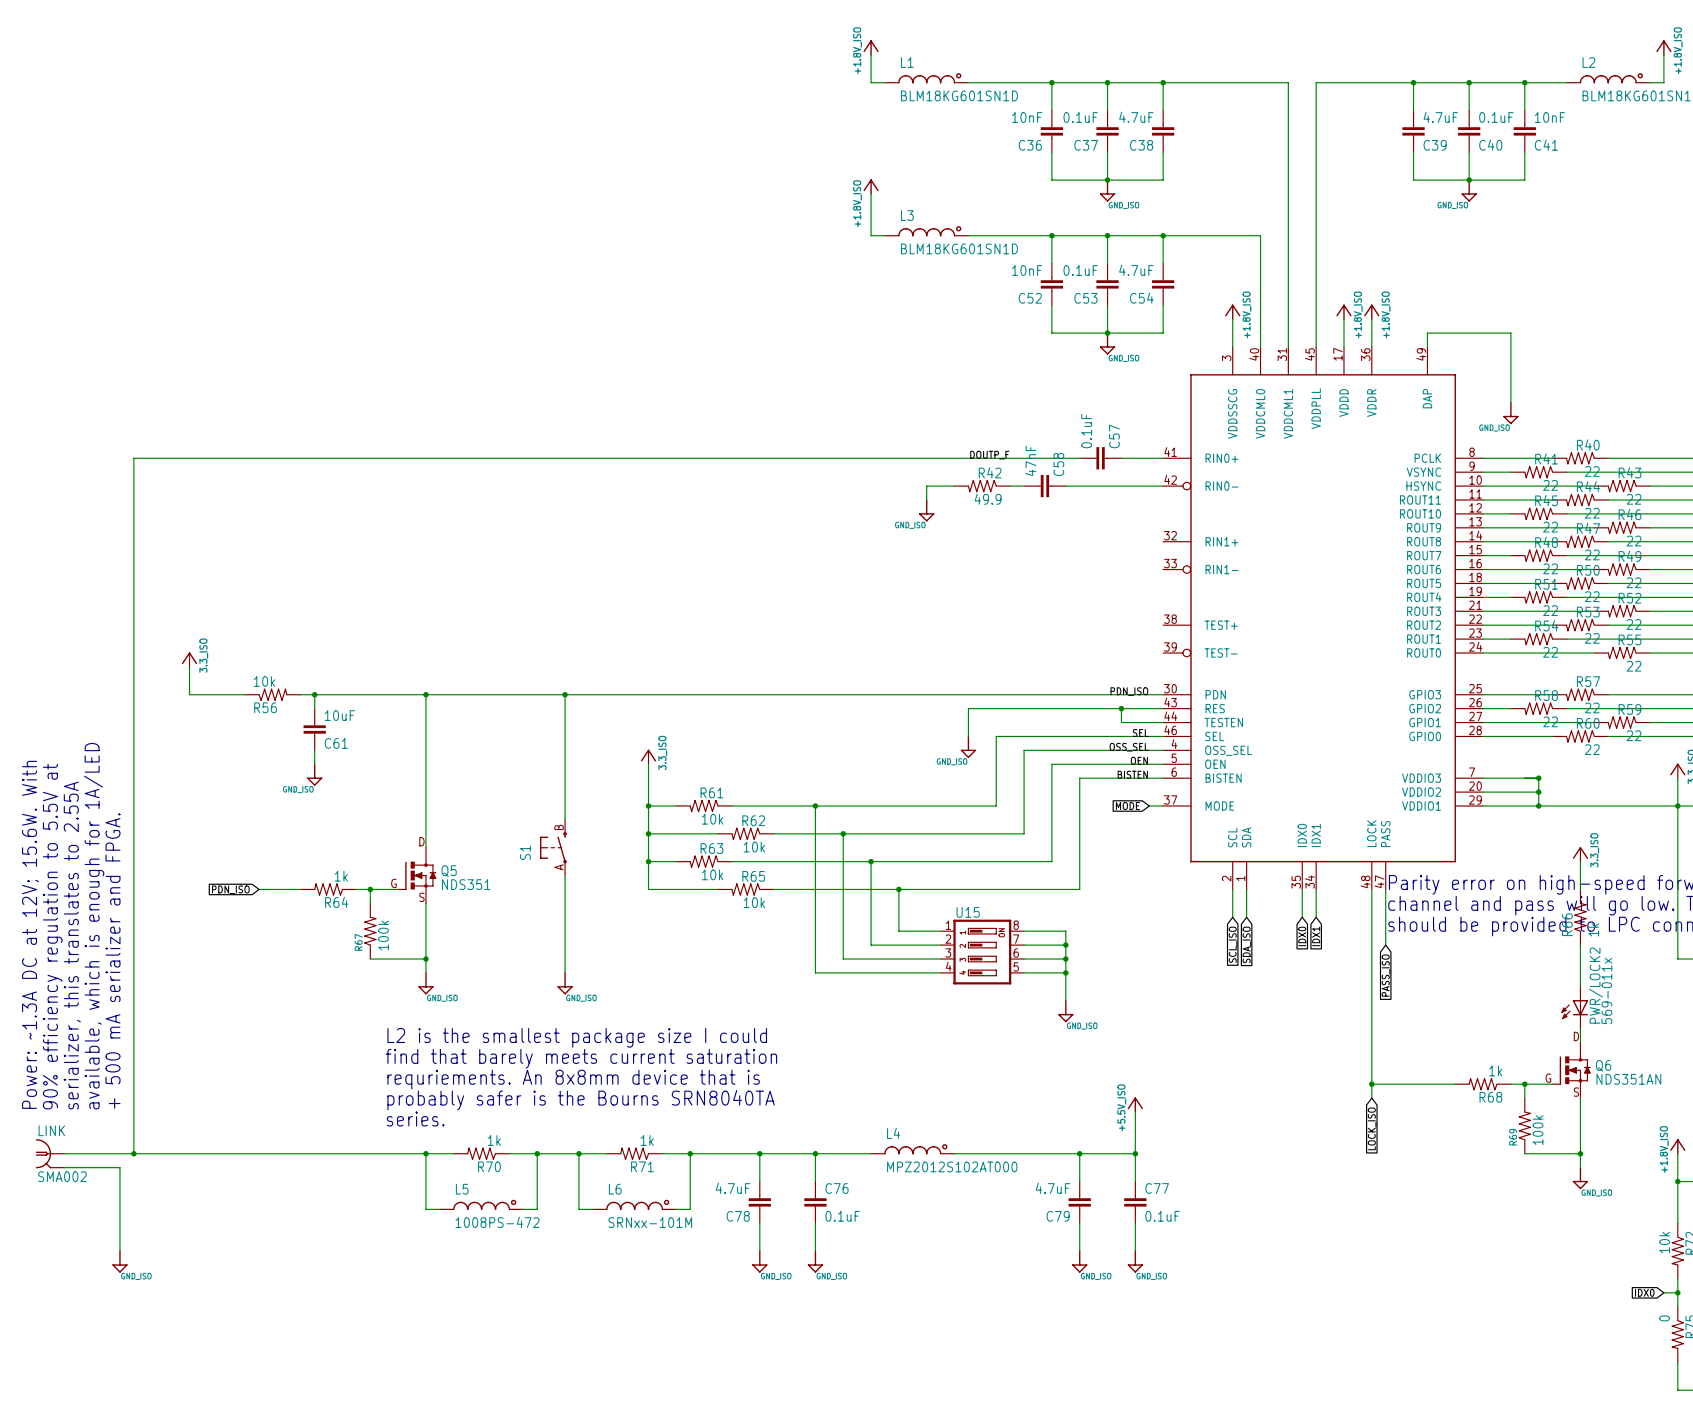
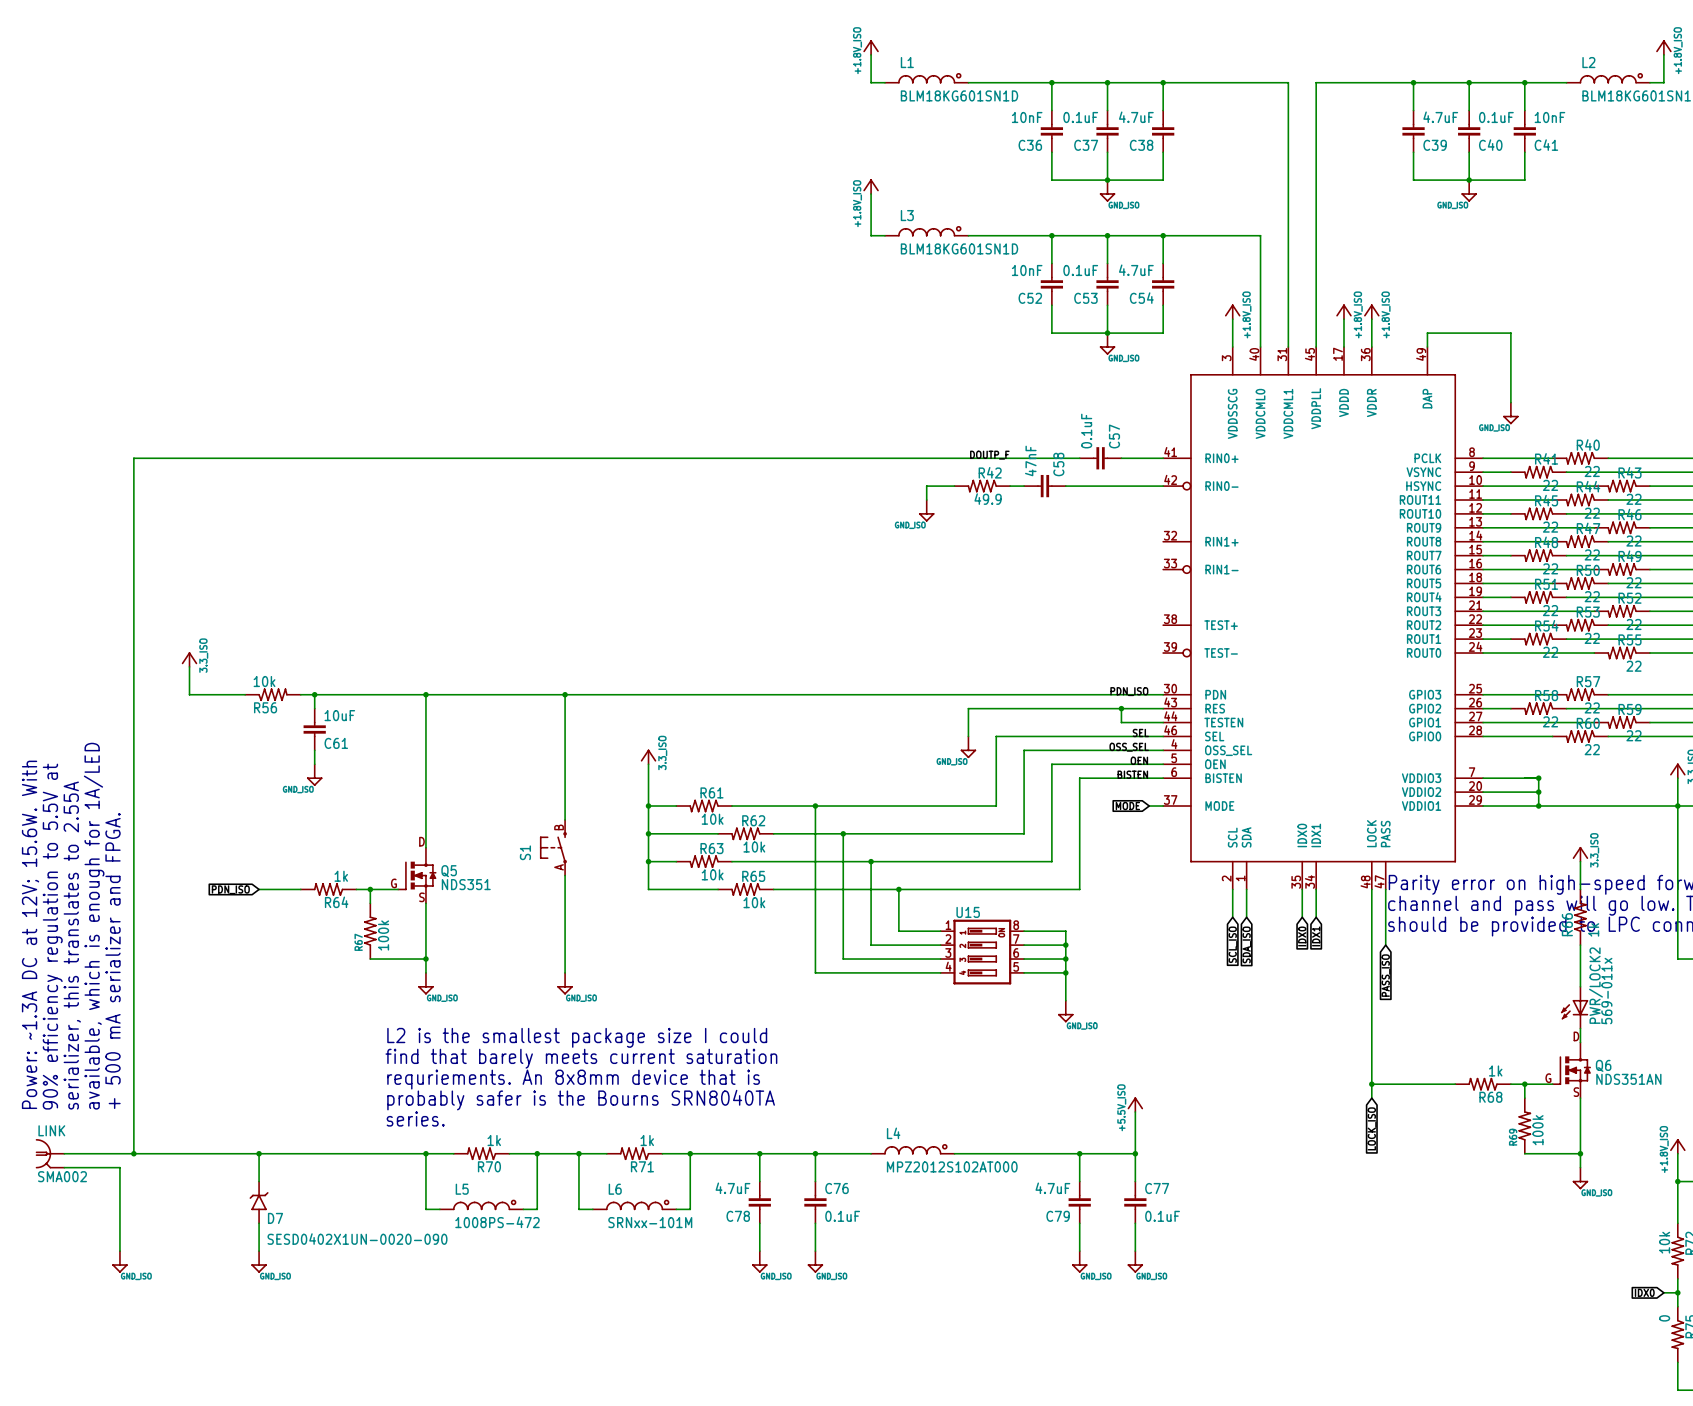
wire: none -> (259, 1153) (259, 1181)
junction: none -> (259, 1153)
D7: none -> SESD0402X1UN-0020-090 (259, 1202)
wire: none -> (259, 1223) (259, 1251)
power symbol: none -> (259, 1261)

